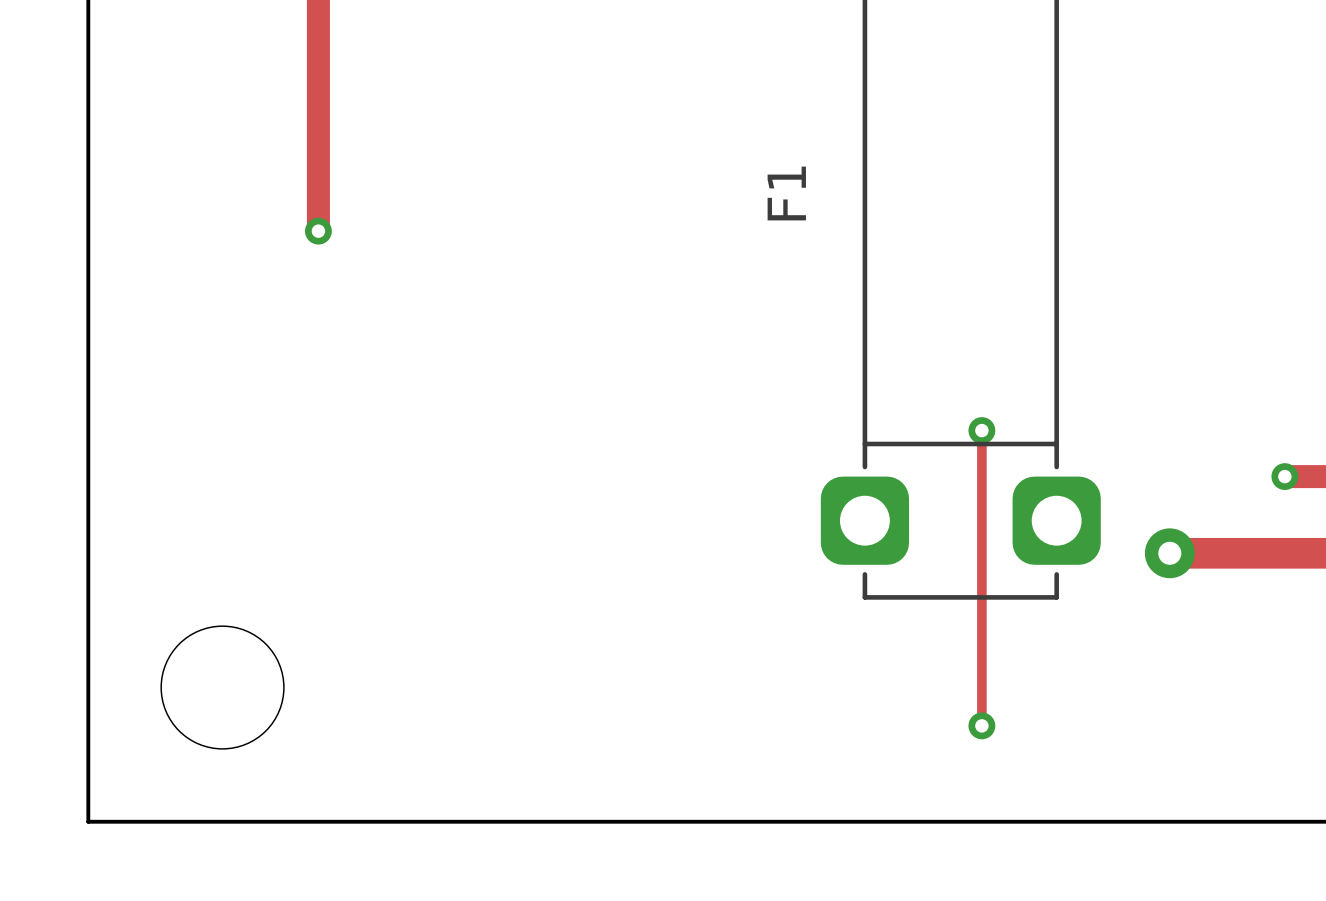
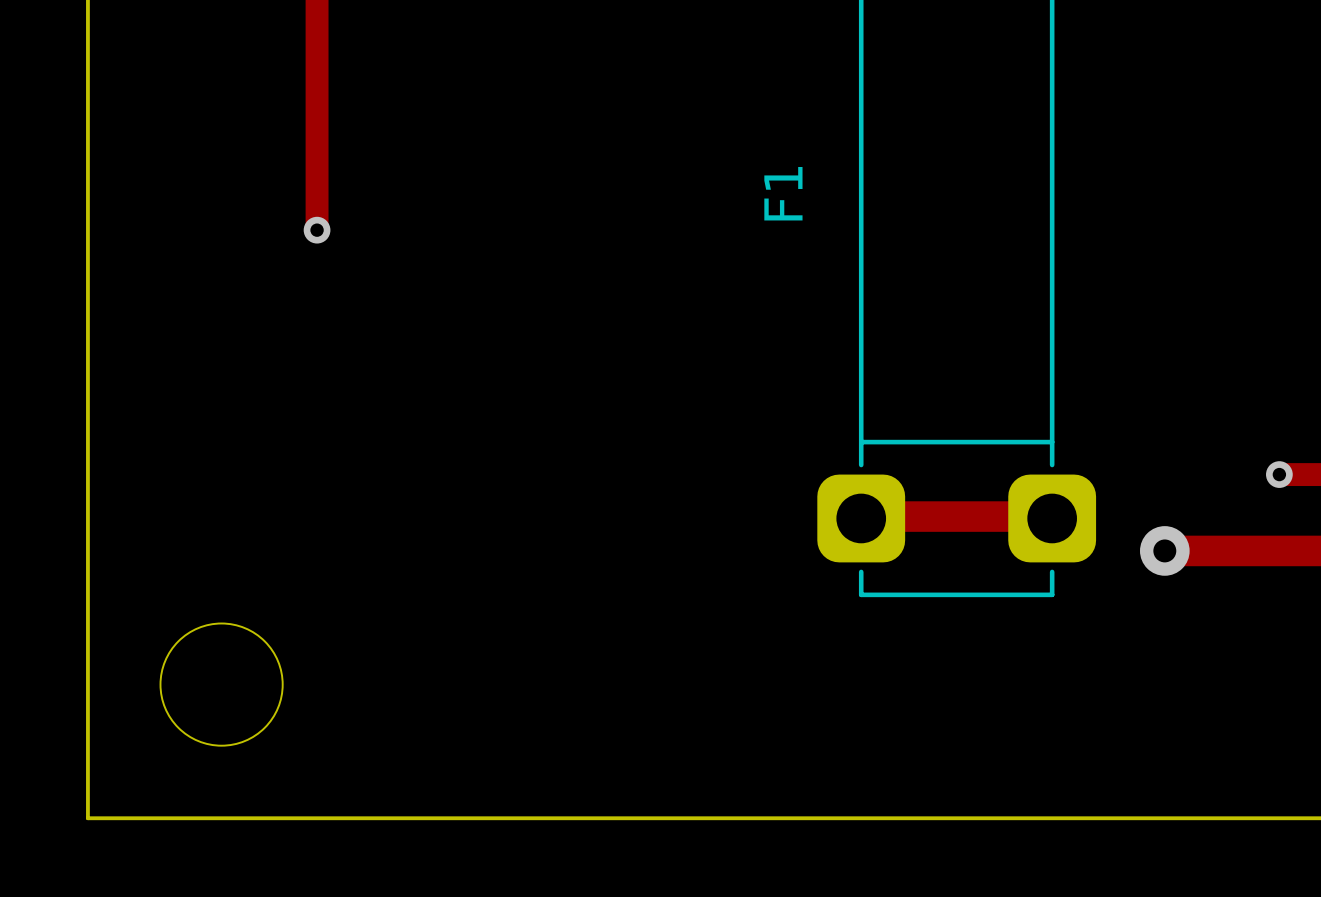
track: (981, 430) (981, 725) -> none
via: (981, 430) -> none
track: none -> (863, 516) (1046, 516)
via: (981, 725) -> none

